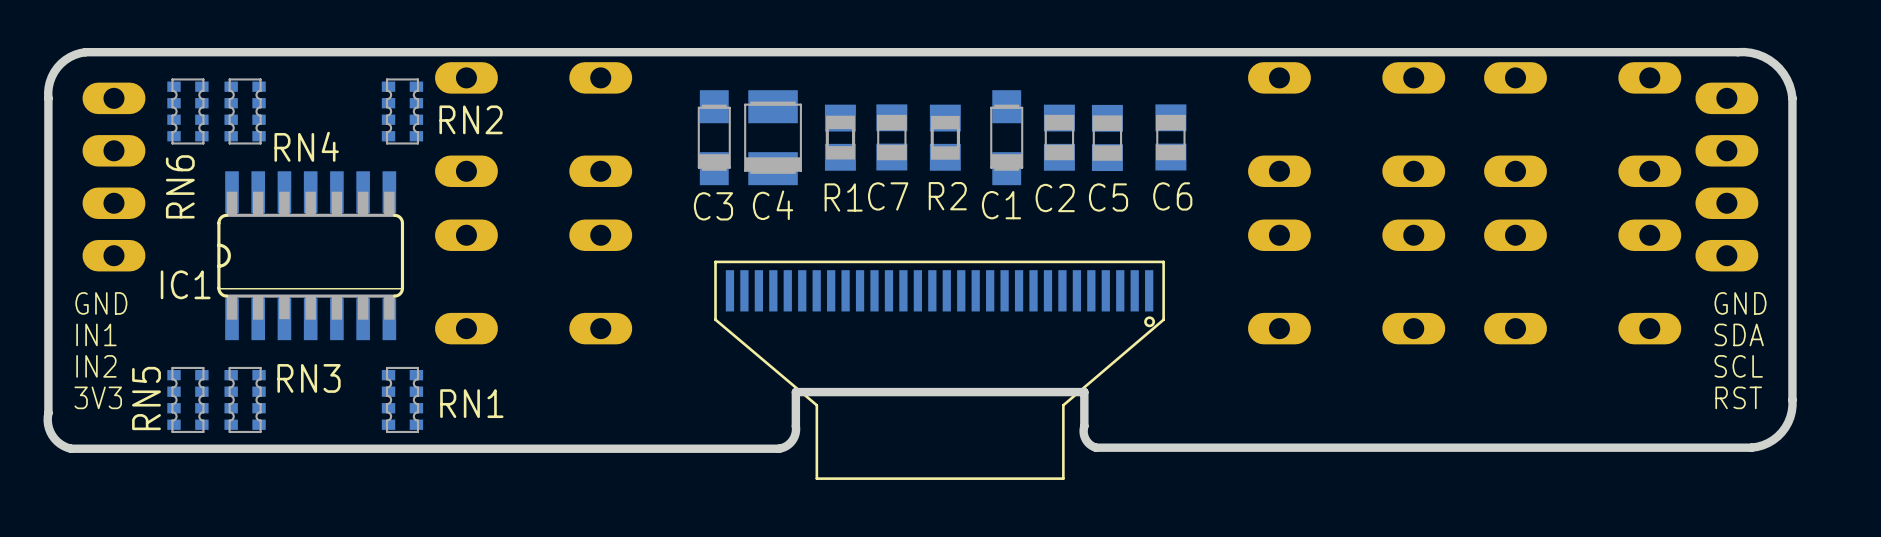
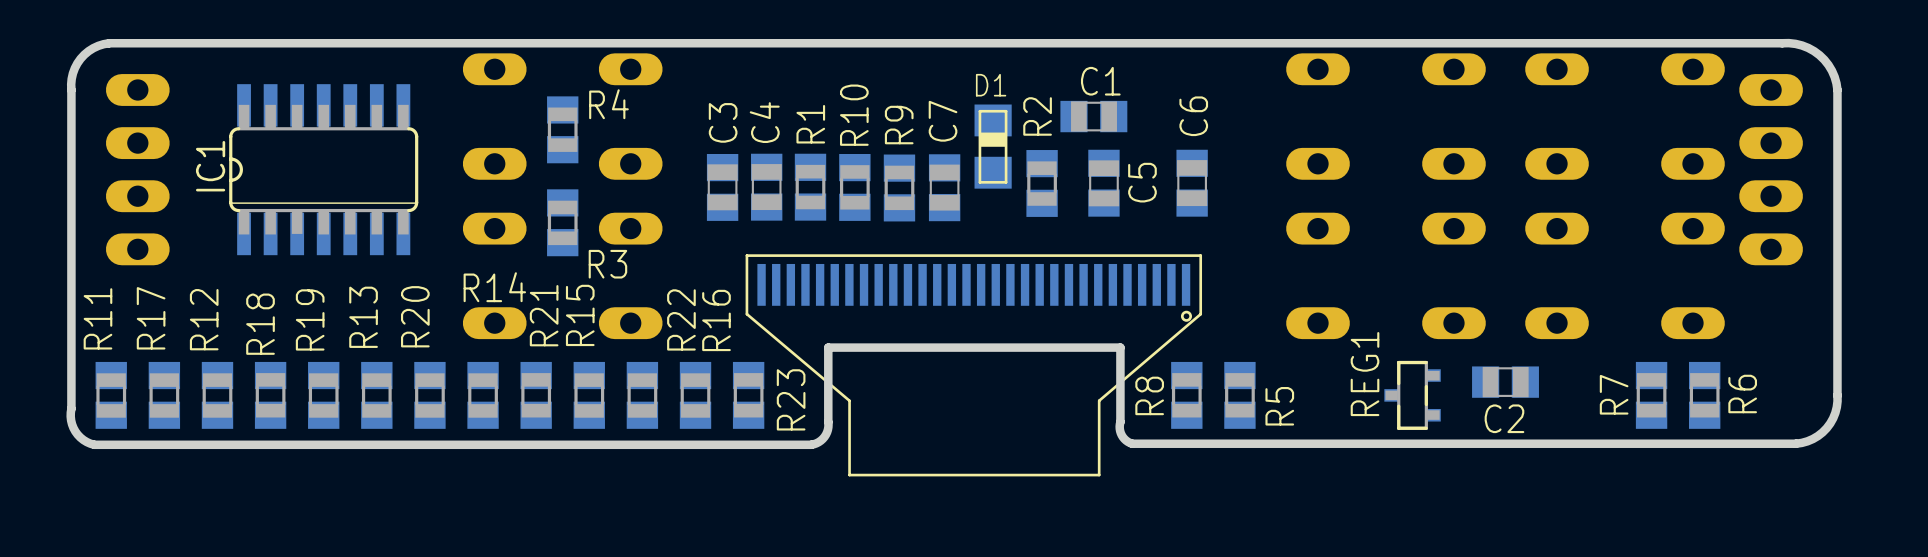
C3 footprint: [697, 90, 731, 186] -> [706, 154, 739, 221]
C4 footprint: [744, 90, 802, 186] -> [751, 153, 783, 221]
C1 footprint: [990, 90, 1024, 186] -> [1060, 100, 1128, 133]
RN6: (187, 111) -> none
RN4: (245, 111) -> none
RN2: (402, 111) -> none
R4: none -> (562, 129)
R1 position: (840, 137) -> (810, 187)
C7 position: (891, 137) -> (944, 187)
R2 position: (945, 137) -> (1042, 183)
C2 rotation: 0° (1059, 137) -> 90° clockwise (1505, 382)
C2 position: (1059, 137) -> (1505, 382)
C5 position: (1107, 137) -> (1103, 183)
C6 position: (1170, 137) -> (1192, 183)
D1: none -> (993, 146)
R10: none -> (854, 187)
R9: none -> (899, 187)
C7 name rotation: 0° (888, 196) -> 90° counterclockwise (943, 121)
C7 name position: C7 (888, 196) -> C7 (943, 121)
R2 name rotation: 0° (947, 196) -> 90° counterclockwise (1037, 116)
R2 name position: R2 (947, 196) -> R2 (1037, 116)
C6 name rotation: 0° (1172, 196) -> 90° counterclockwise (1193, 116)
C6 name position: C6 (1172, 196) -> C6 (1193, 116)
R1 name rotation: 0° (843, 197) -> 90° counterclockwise (810, 124)
R1 name position: R1 (843, 197) -> R1 (810, 124)
C5 name rotation: 0° (1108, 197) -> 90° counterclockwise (1142, 182)
C4 name position: C4 (773, 205) -> C4 (764, 122)
C1 name position: C1 (1001, 205) -> C1 (1100, 81)
C3 name position: C3 (713, 206) -> C3 (723, 122)
R3: none -> (562, 222)
IC1 position: (310, 255) -> (323, 169)
IC1 name rotation: 0° (185, 284) -> 90° counterclockwise (210, 166)
text: GND (101, 303) -> none
text: GND (1740, 303) -> none
text: IN1 (96, 334) -> none
text: SDA (1739, 334) -> none
text: IN2 (96, 366) -> none
text: SCL (1738, 366) -> none
board edge: (1084, 392) (795, 392) -> (1120, 387) (1120, 347) (828, 347) (828, 387)
text: 3V3 (98, 397) -> none
text: RST (1738, 397) -> none
R11: none -> (111, 395)
R17: none -> (164, 395)
RN5: (187, 399) -> none
R12: none -> (217, 395)
RN3: (245, 399) -> none
R18: none -> (270, 395)
R19: none -> (323, 395)
R13: none -> (376, 395)
RN1: (402, 399) -> none
R20: none -> (429, 395)
R14: none -> (483, 395)
R21: none -> (536, 395)
R15: none -> (589, 395)
R22: none -> (642, 395)
R16: none -> (695, 395)
R23: none -> (748, 395)
R8: none -> (1186, 395)
R5: none -> (1239, 395)
REG1: none -> (1412, 395)
R7: none -> (1651, 395)
R6: none -> (1704, 395)

